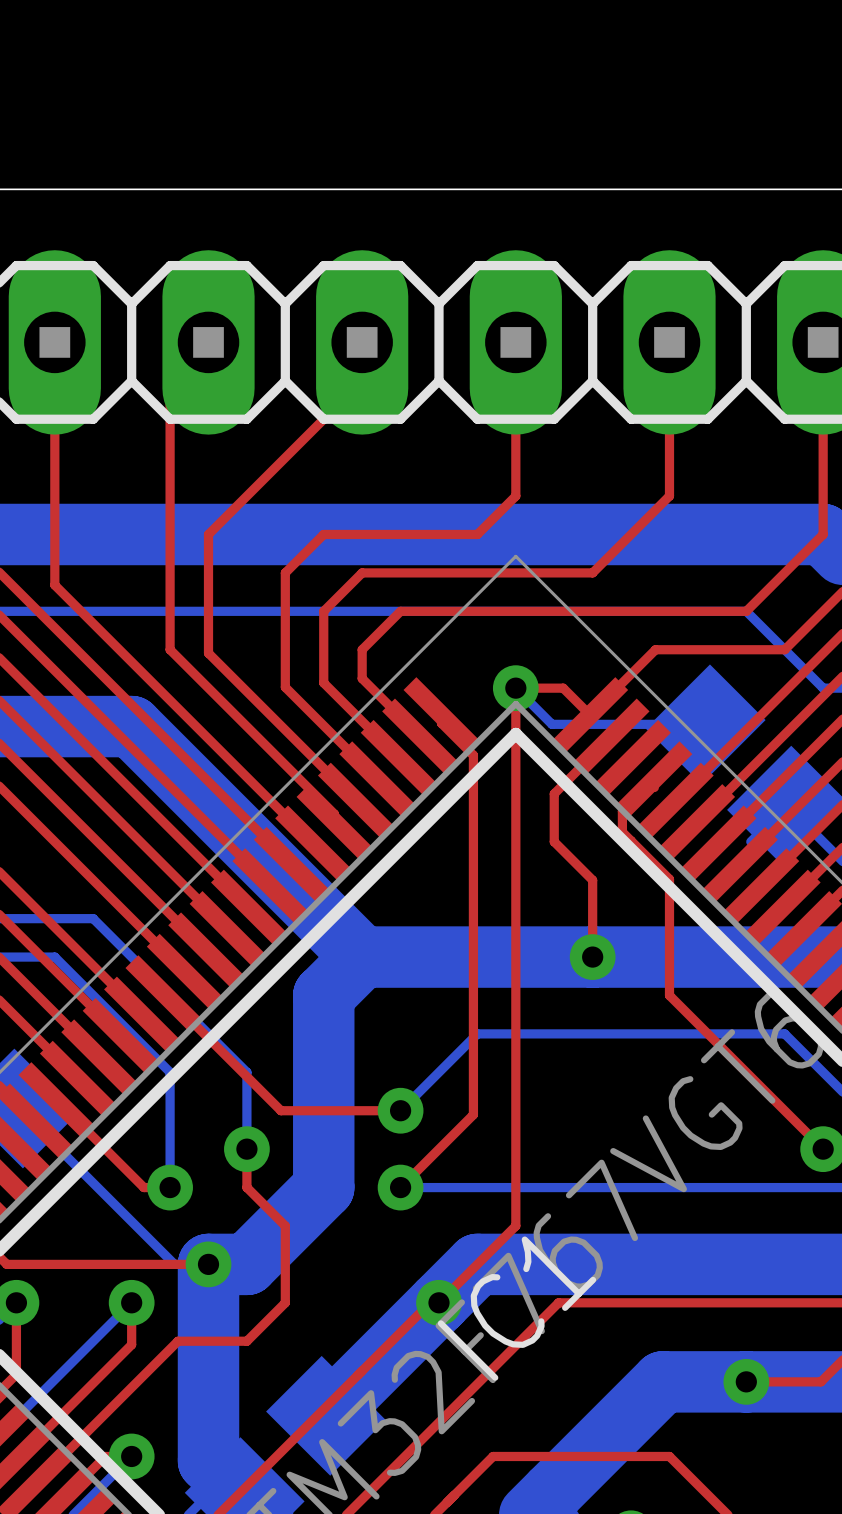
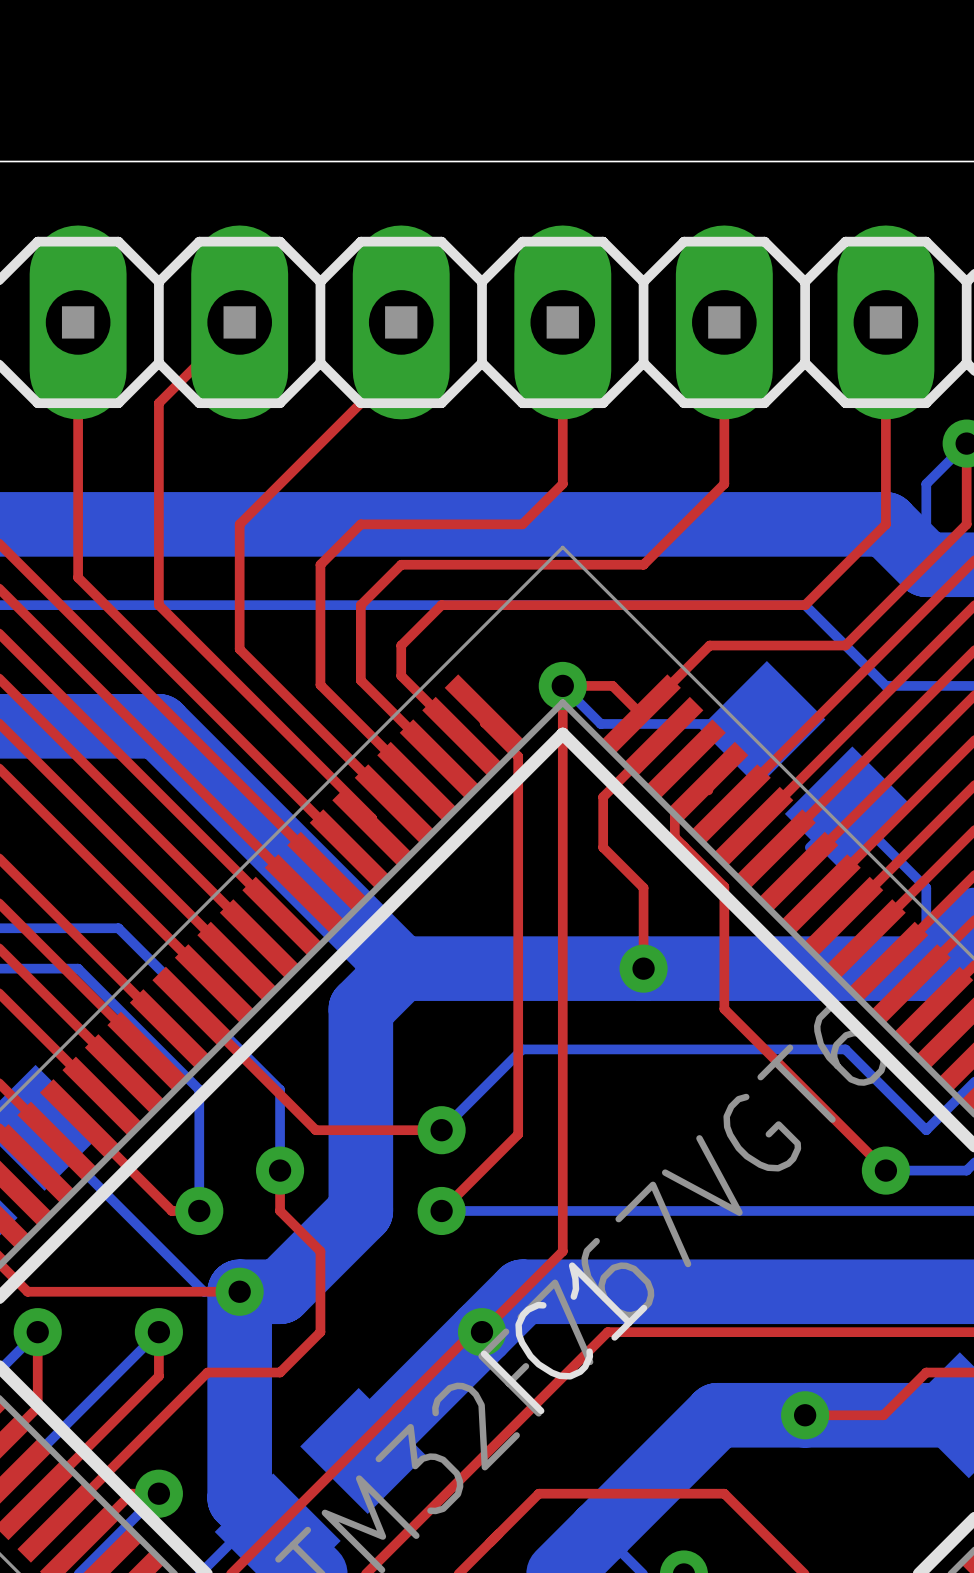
top track: (170, 380) (170, 649) -> (199, 362) (158, 403) (158, 605) (199, 645)

